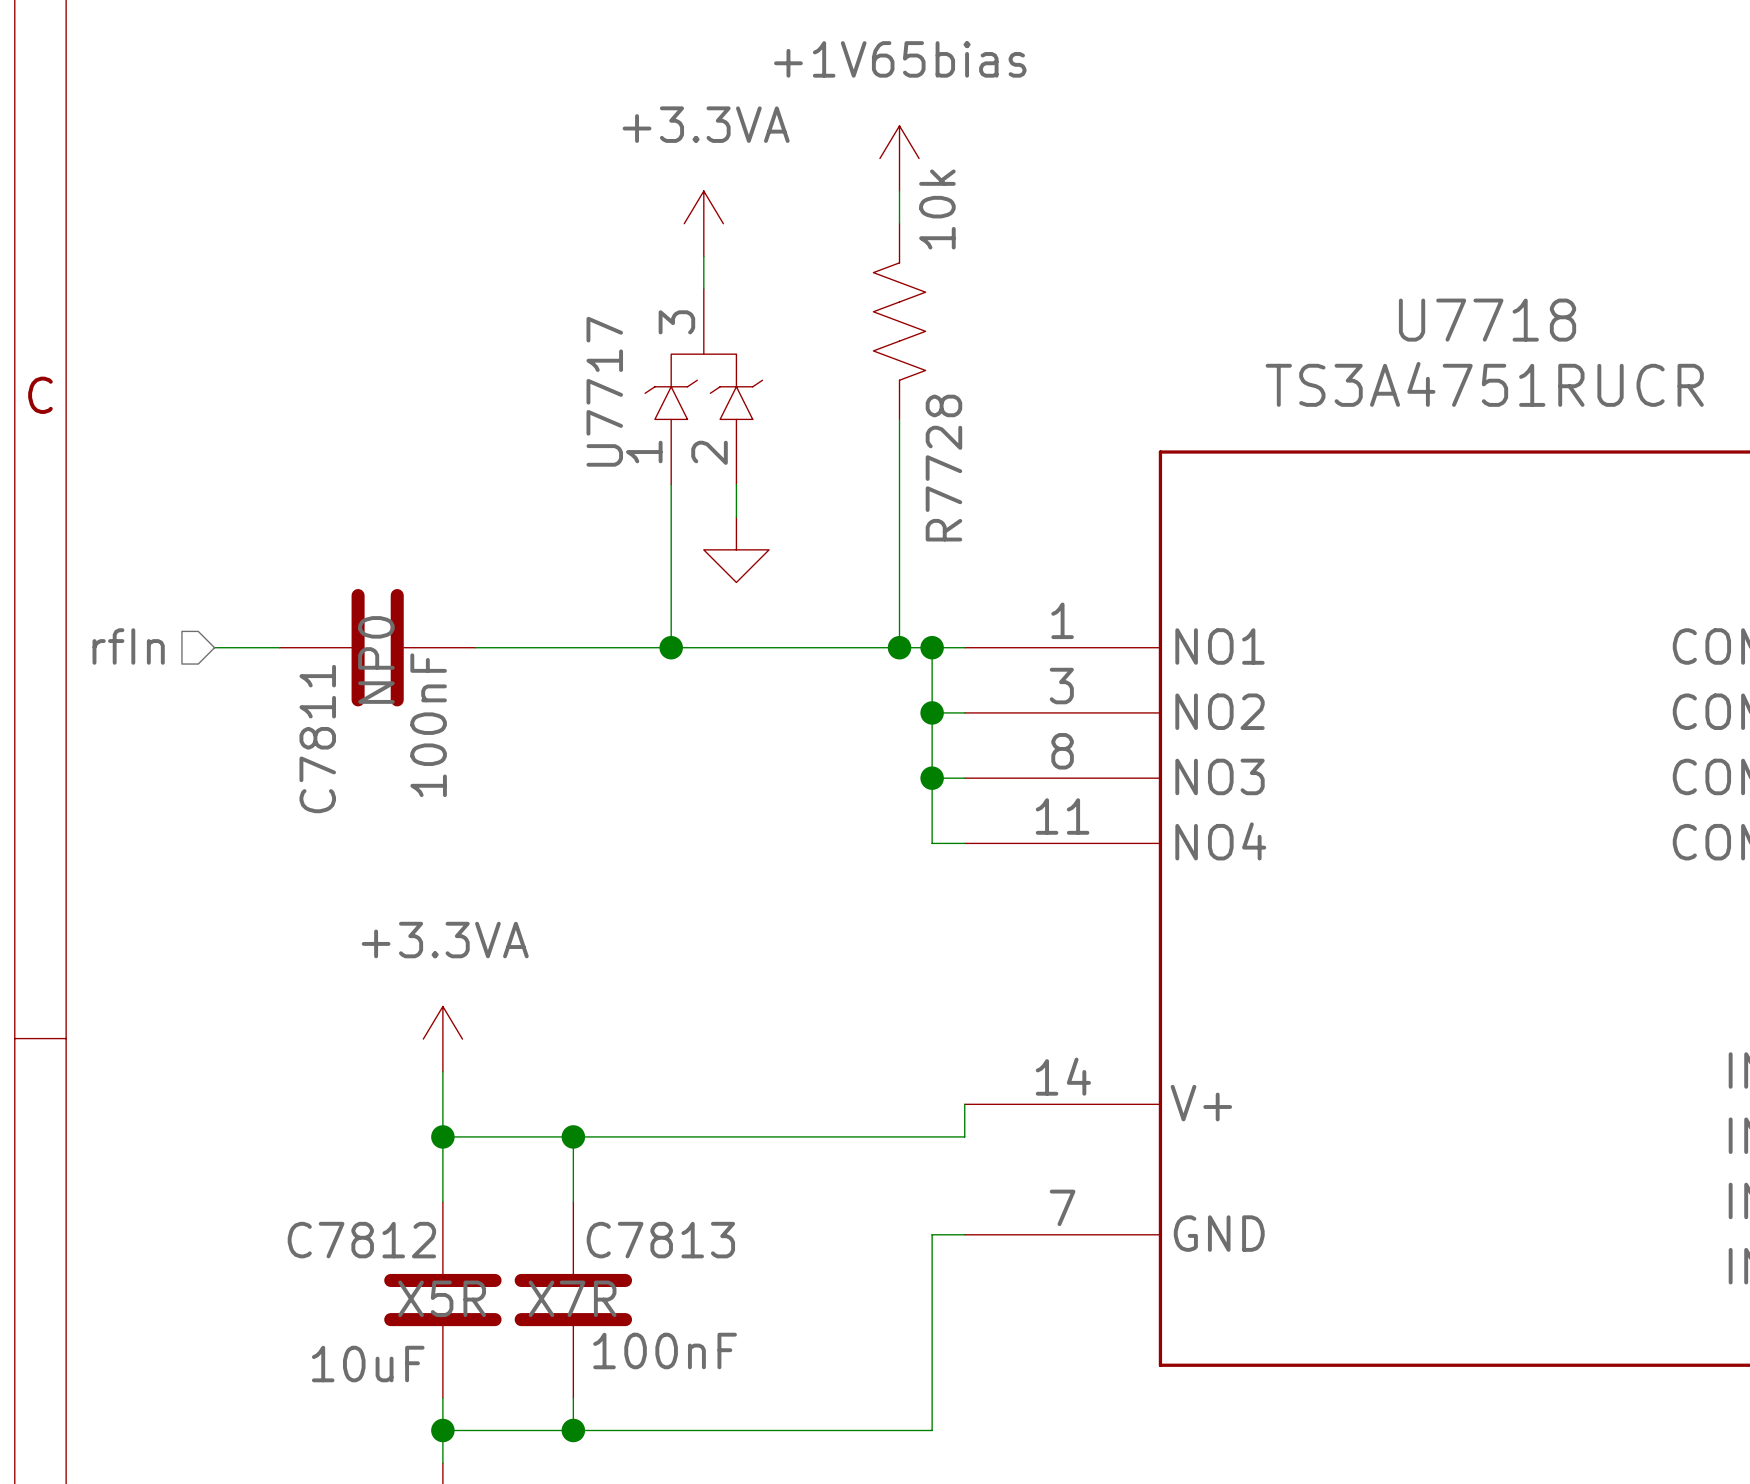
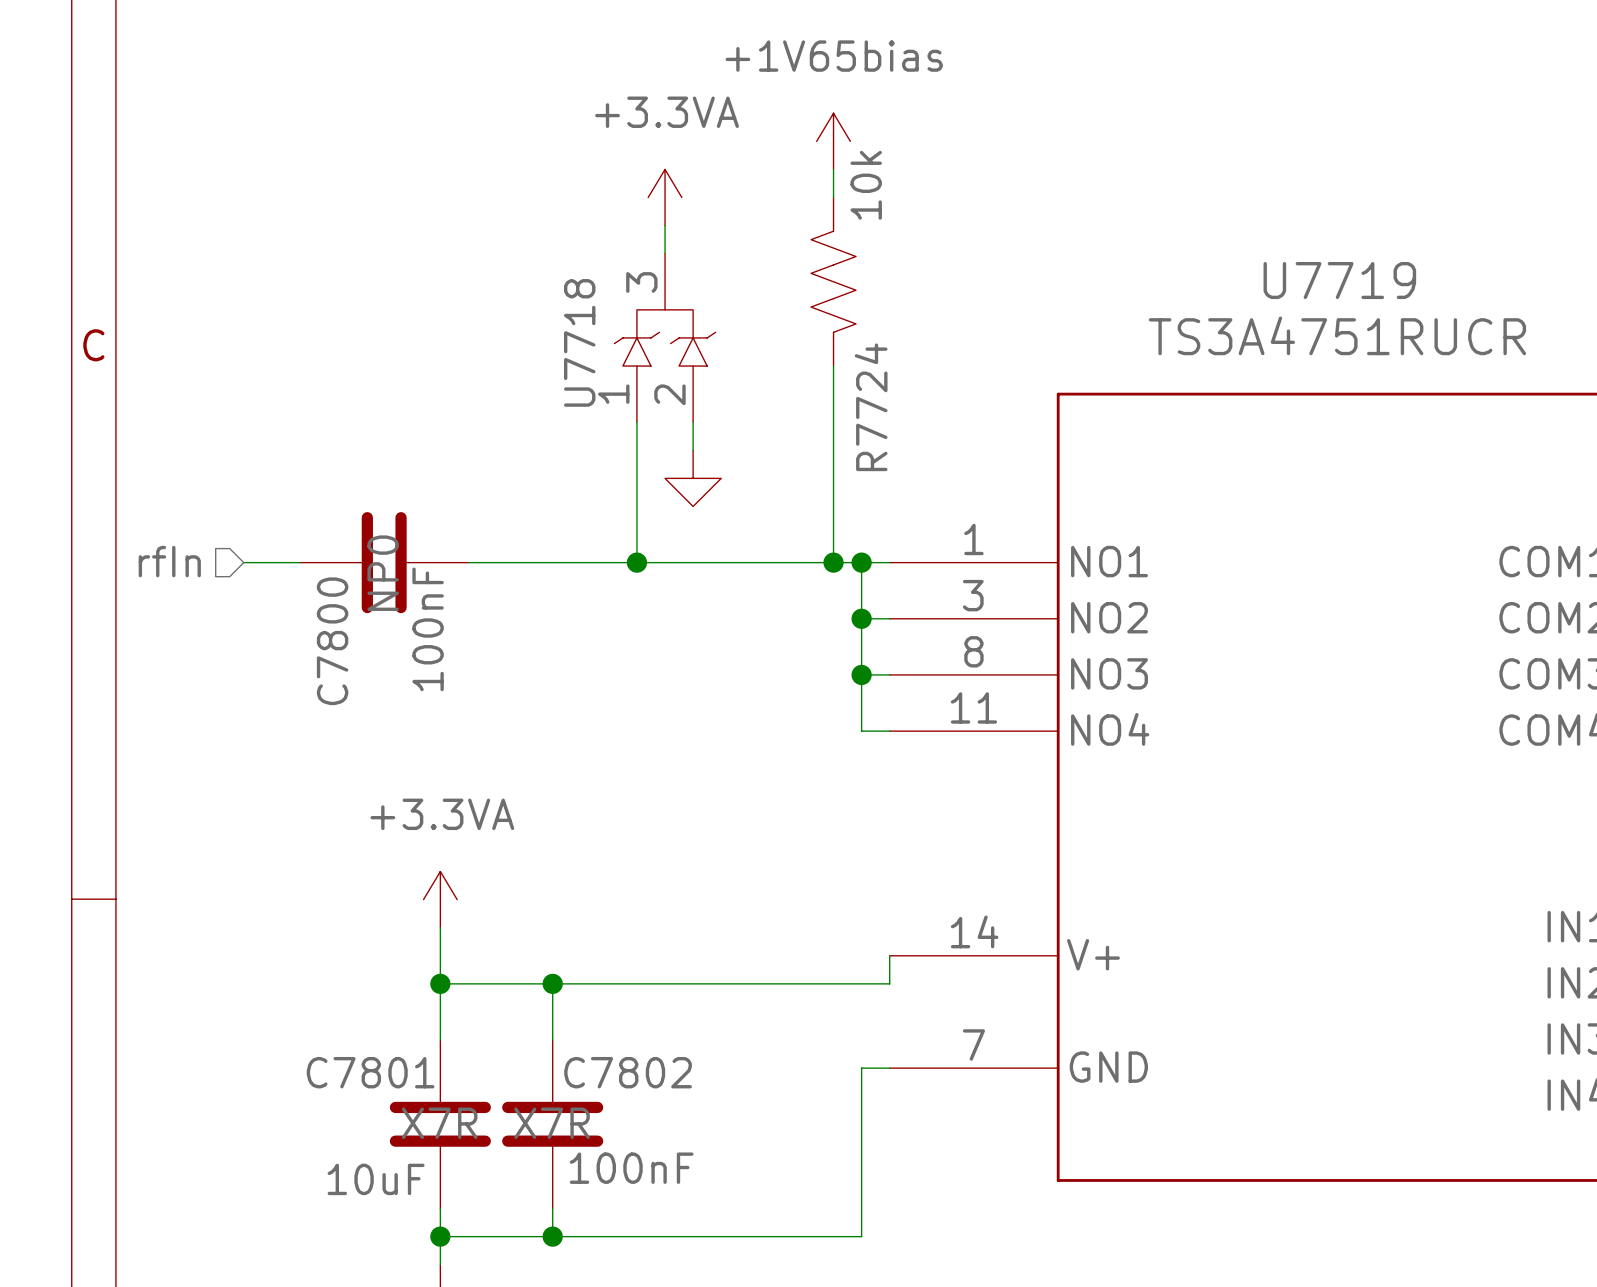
U7718 name: U7718 (1487, 320) -> U7719 (1339, 280)
U7717 name: U7717 (604, 391) -> U7718 (579, 342)
R7728 name: R7728 (943, 468) -> R7724 (871, 407)
C7811 name: C7811 (317, 739) -> C7800 (332, 641)
C7812 name: C7812 (361, 1240) -> C7801 (370, 1072)
C7813 name: C7813 (660, 1240) -> C7802 (628, 1072)
C7812 text: X5R (442, 1298) -> X7R (439, 1123)

